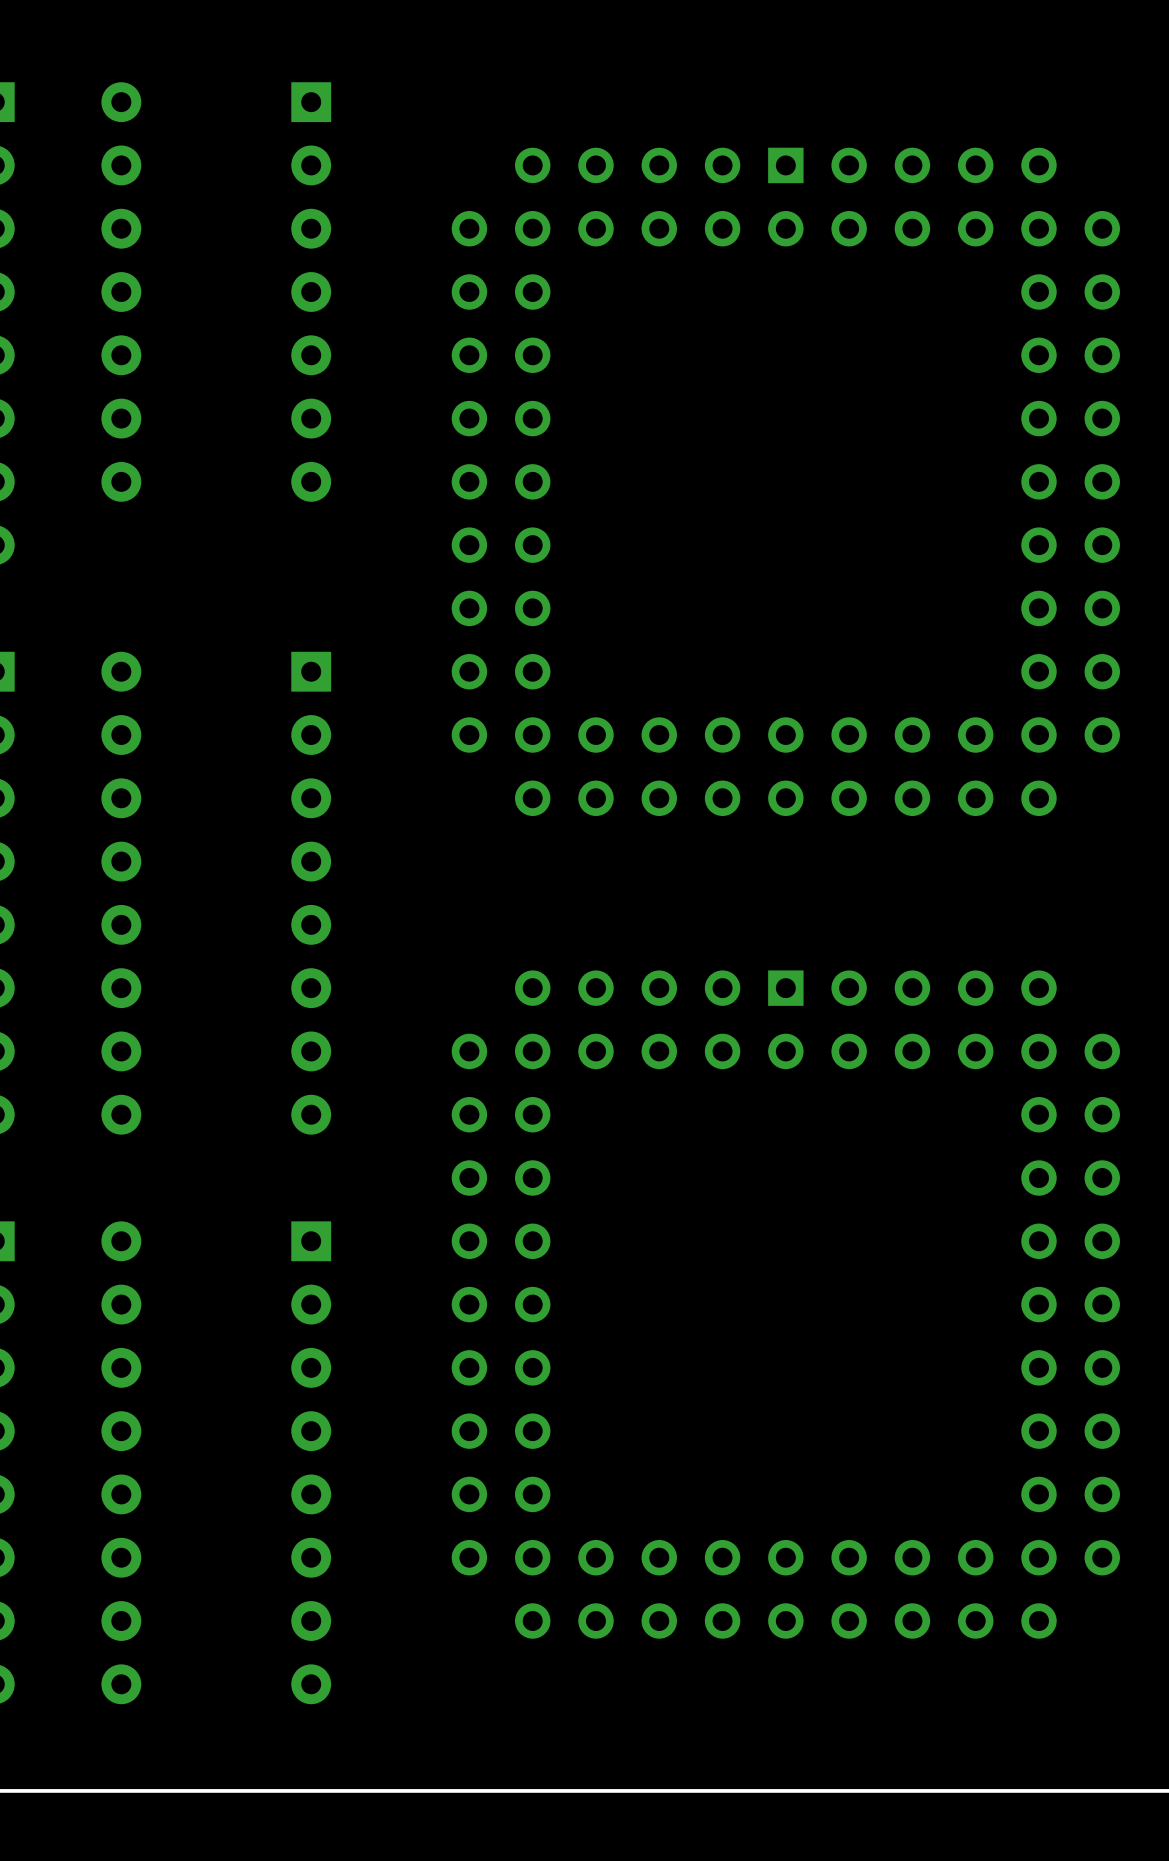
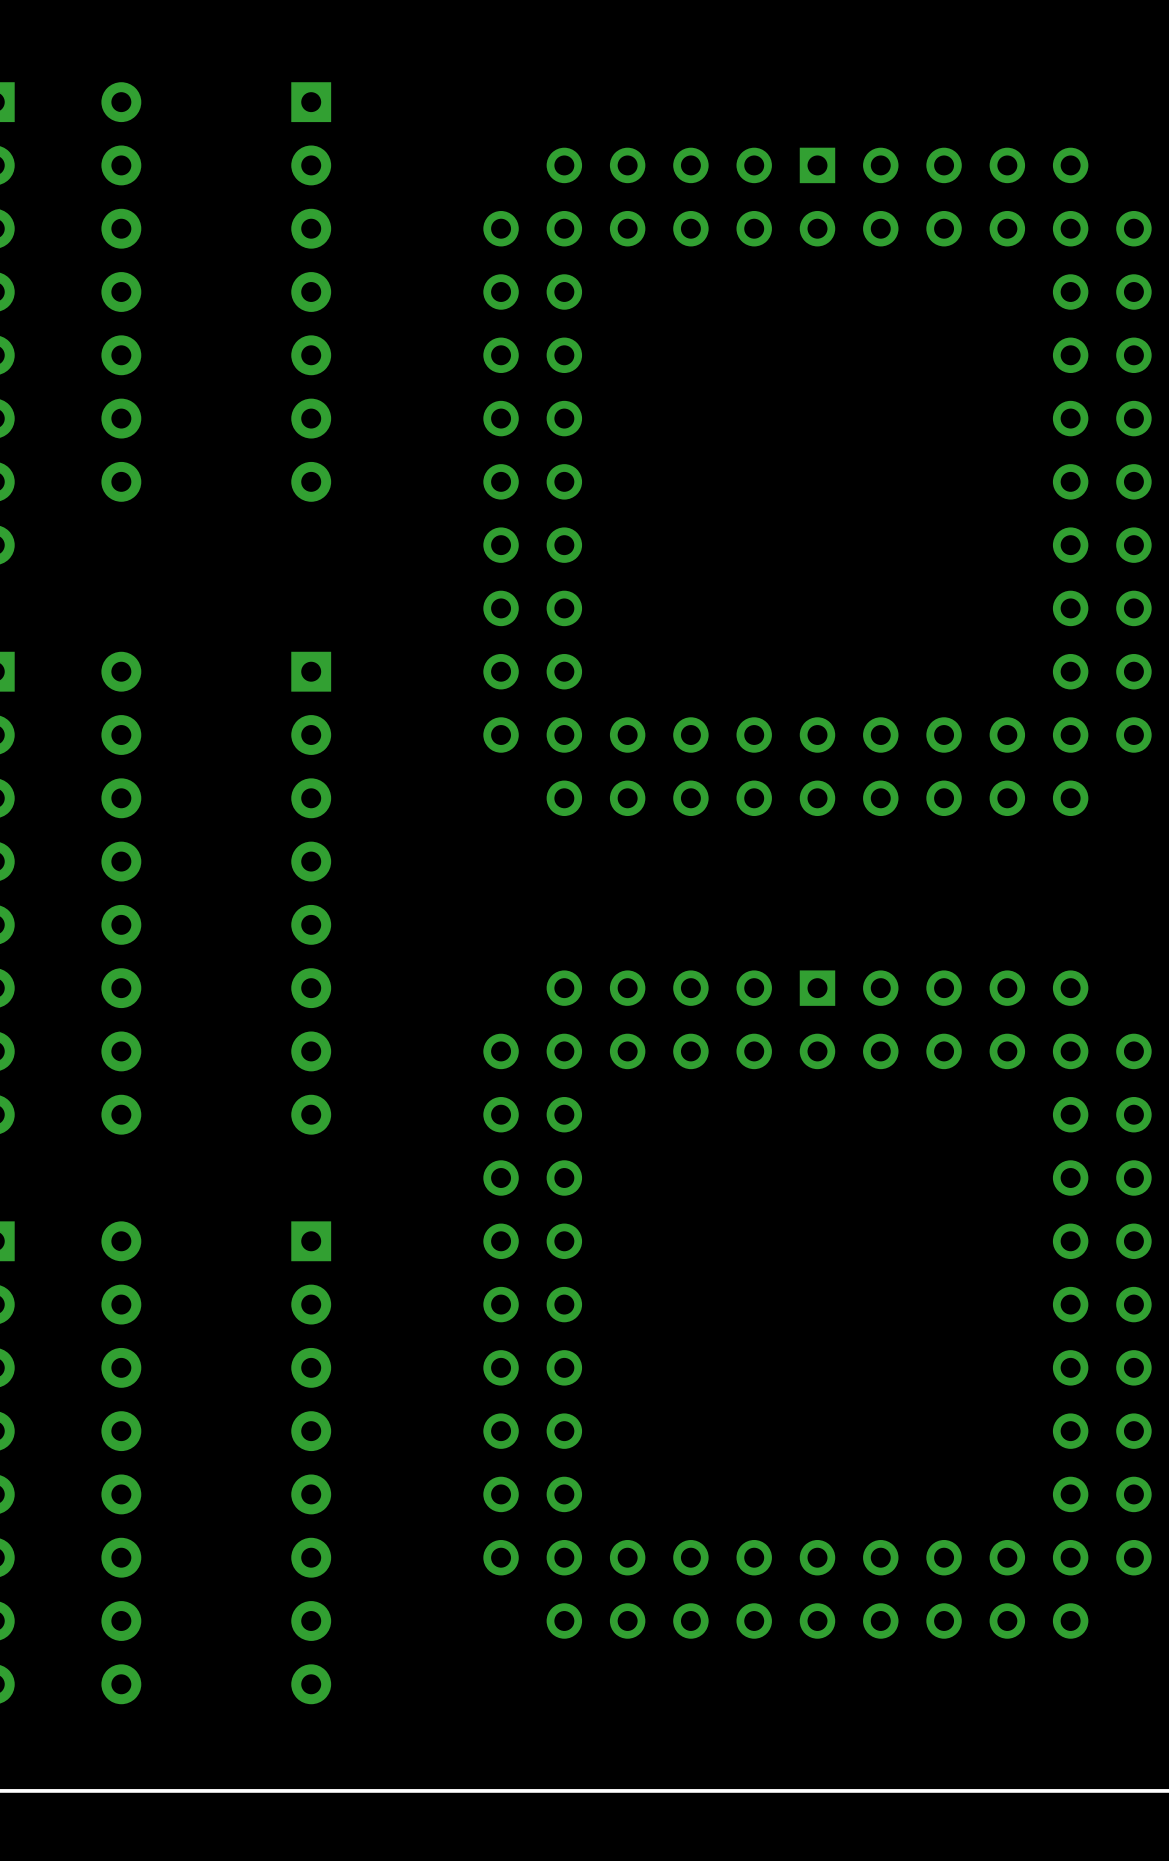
part position: (785, 481) -> (817, 481)
part position: (785, 1304) -> (817, 1304)

